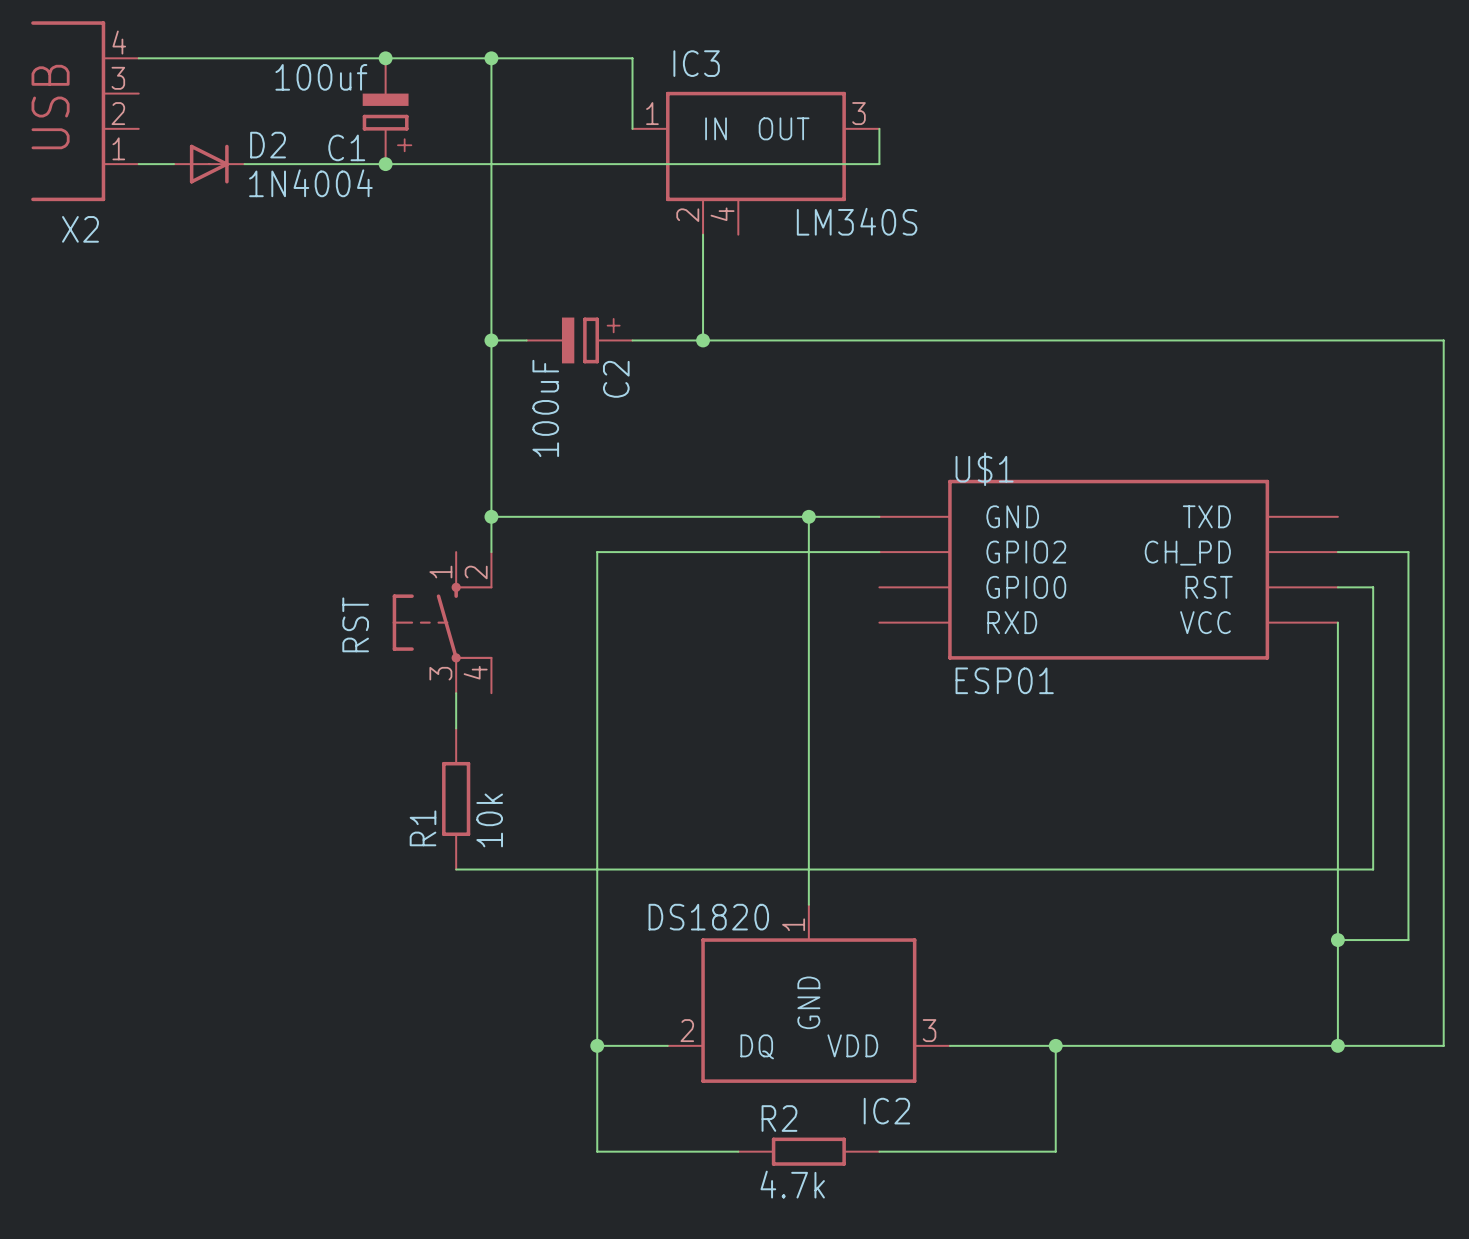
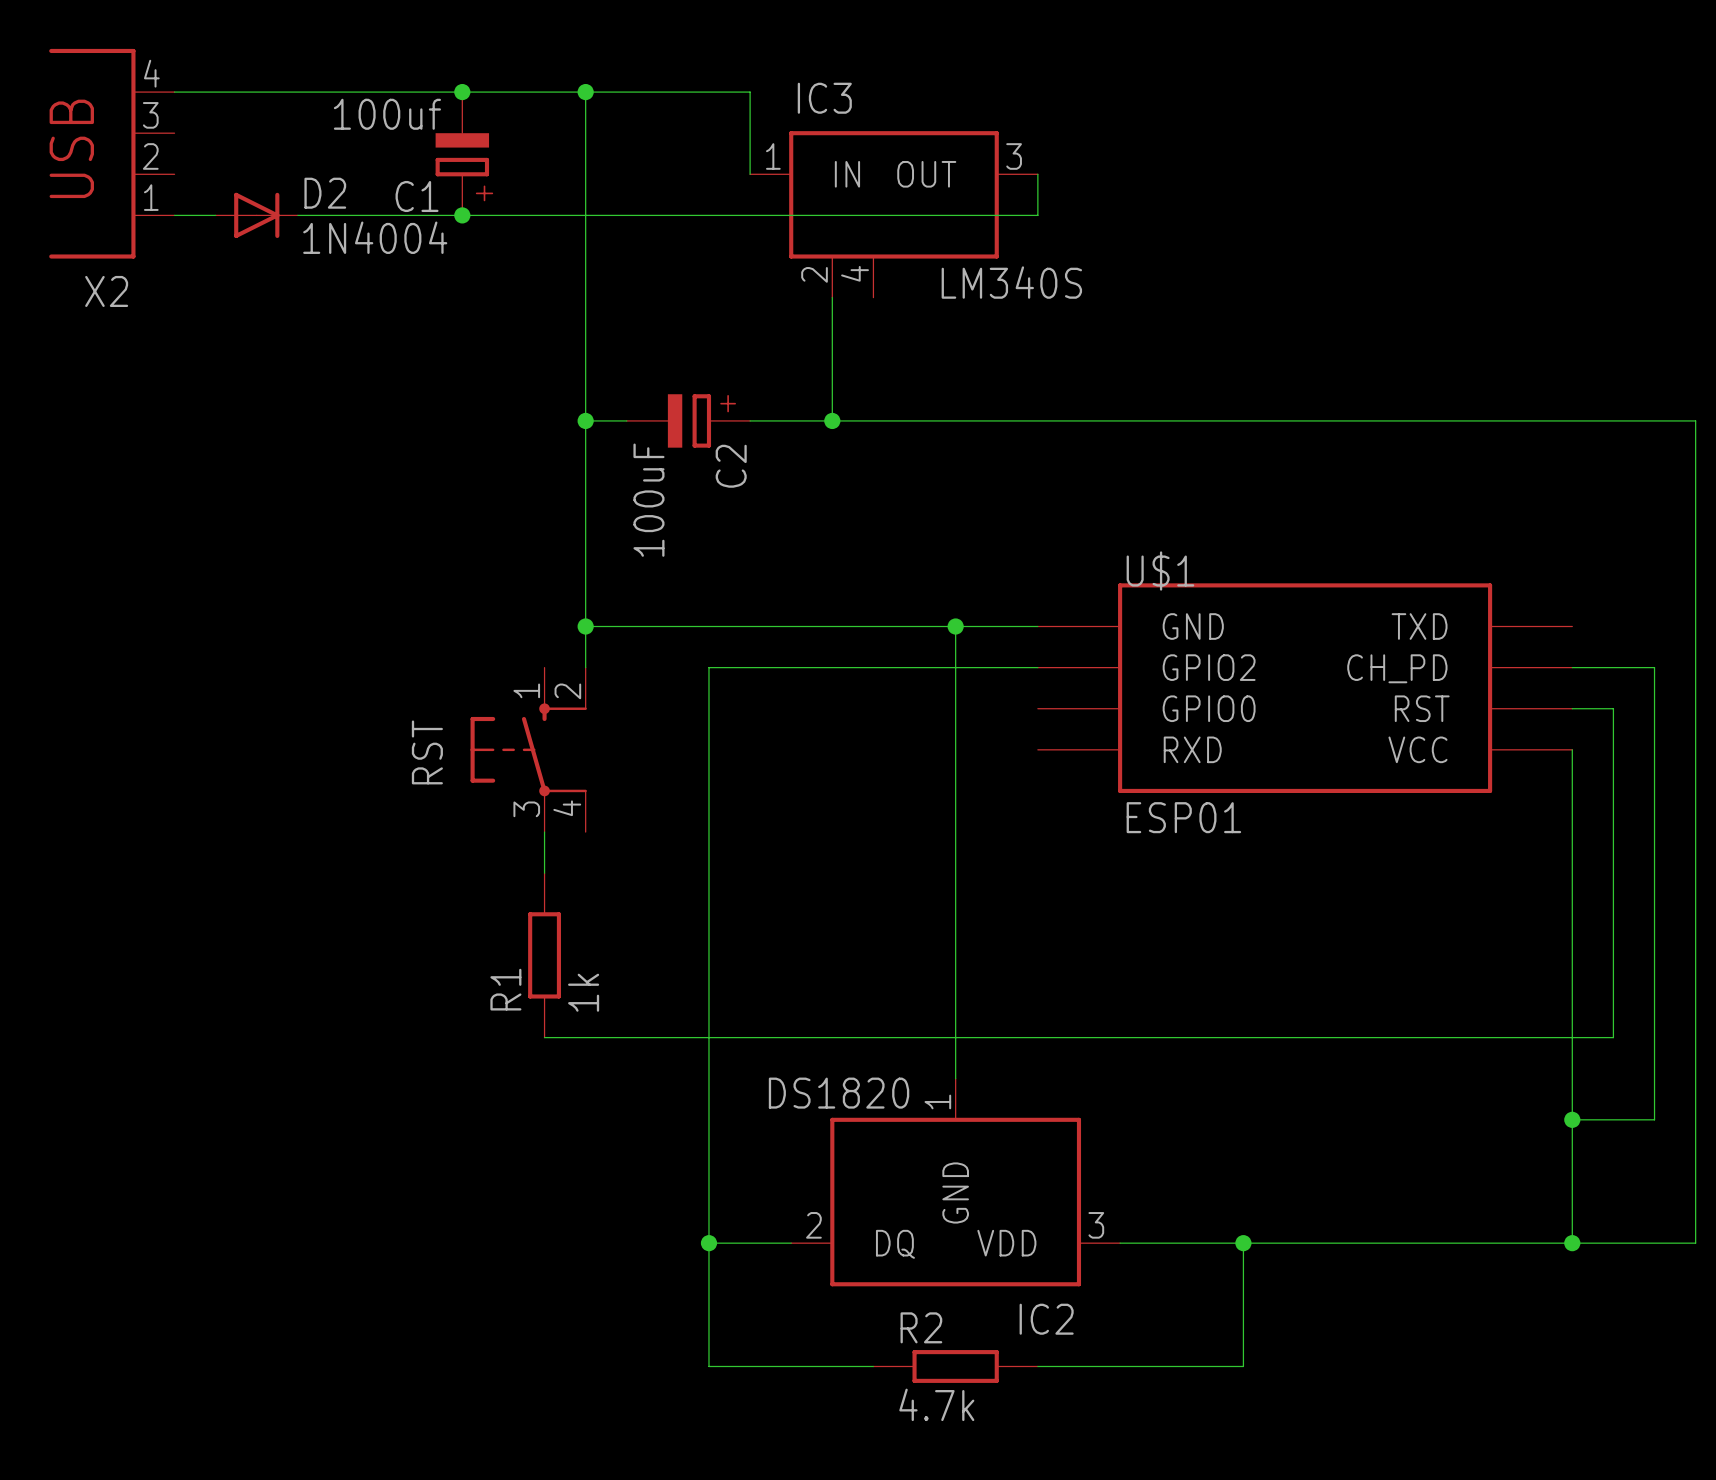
R1 value: 10k (489, 820) -> 1k (583, 992)

